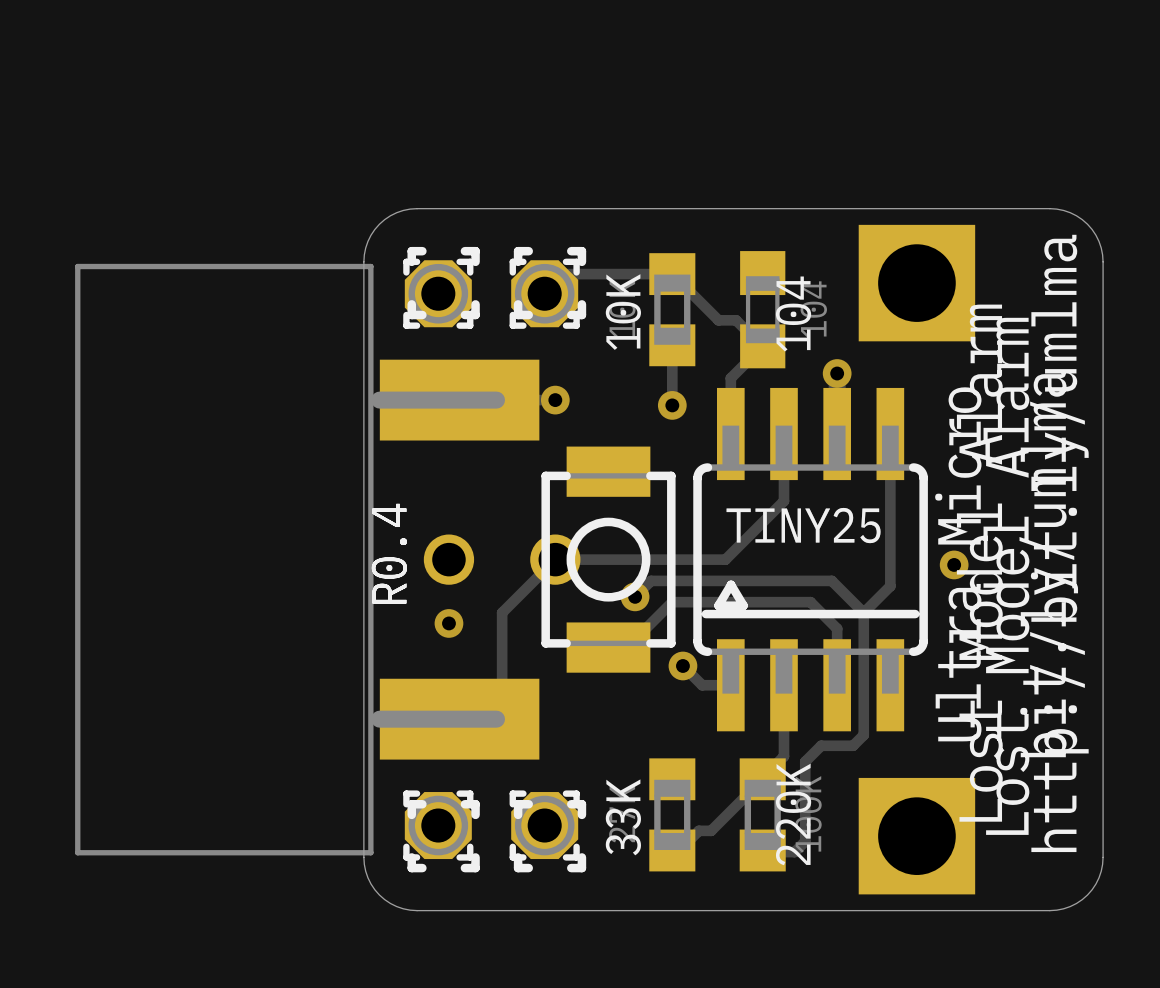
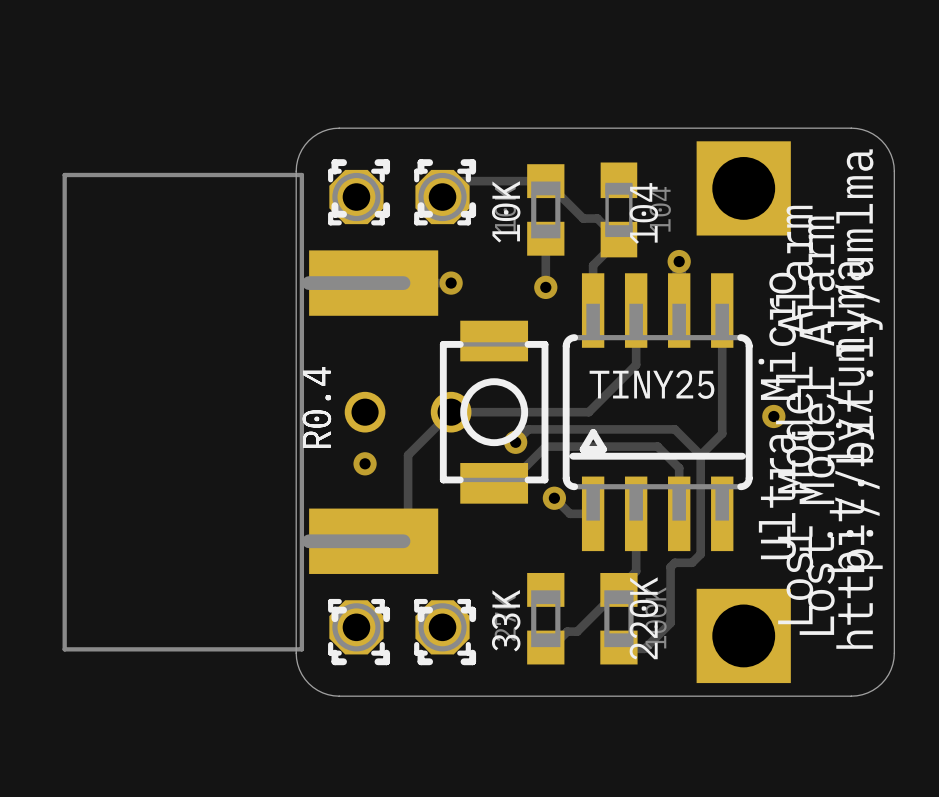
track: (831, 745) (821, 745) (805, 761) (805, 841) -> (674, 562) (670, 567) (670, 623) (653, 640)

